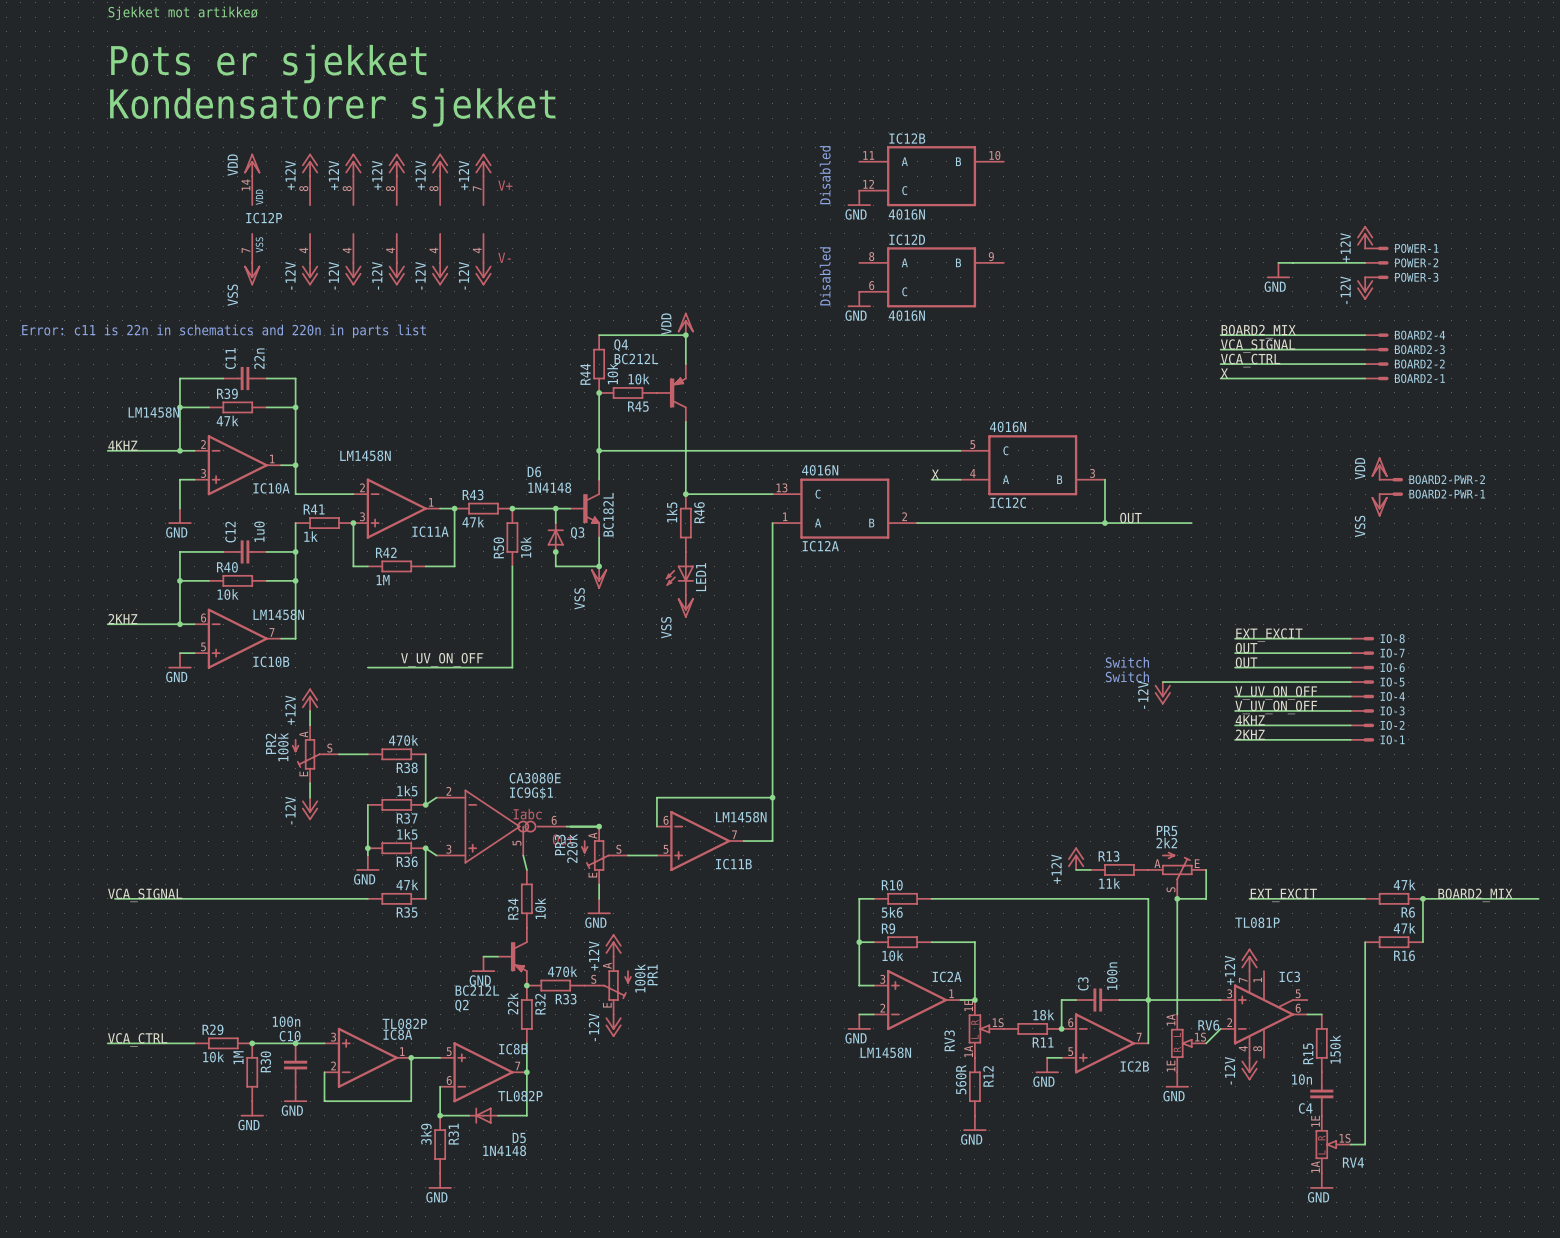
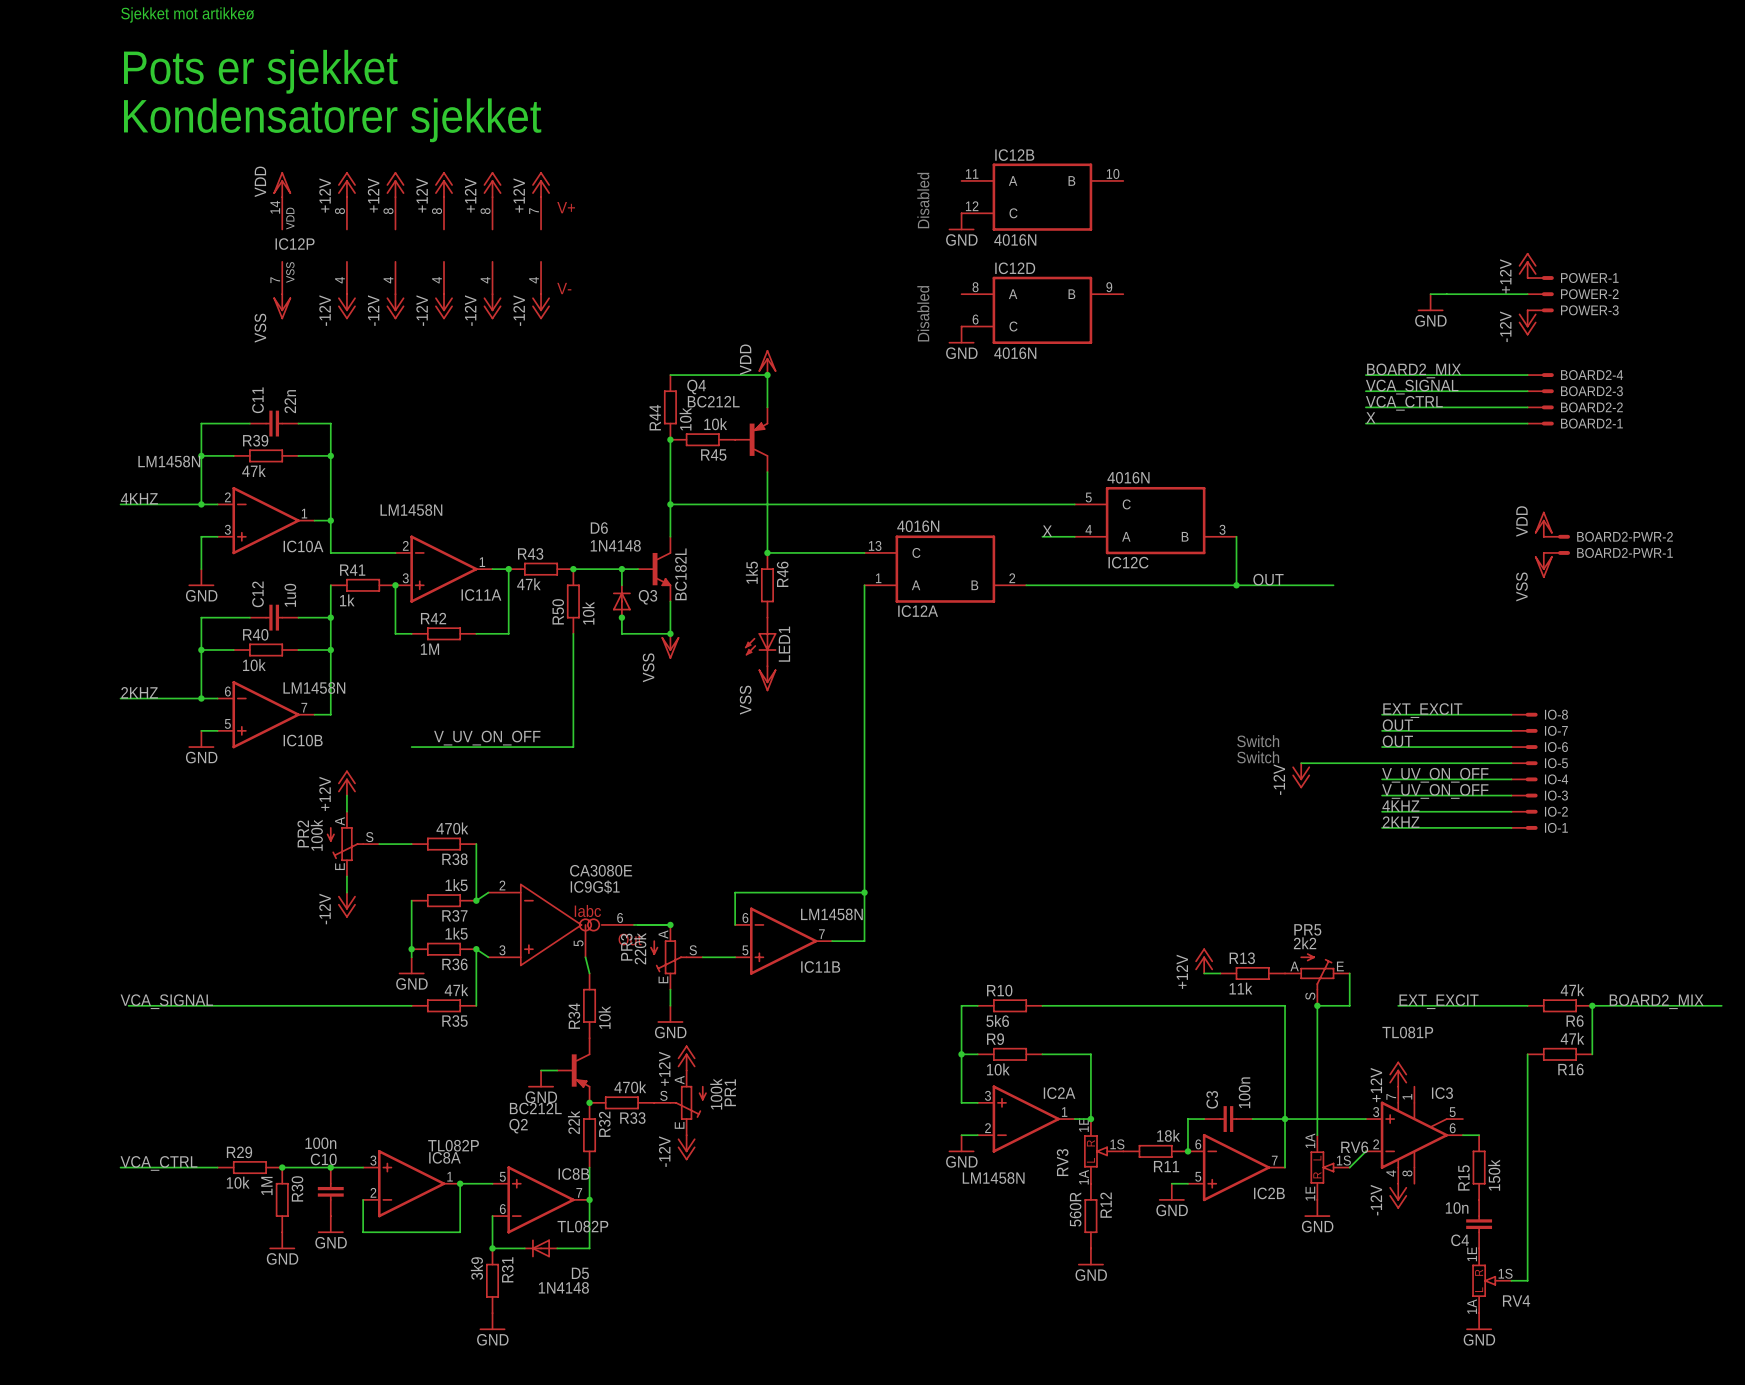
text: Error: c11 is 22n in schematics and 220n in parts list (223, 331) -> none

